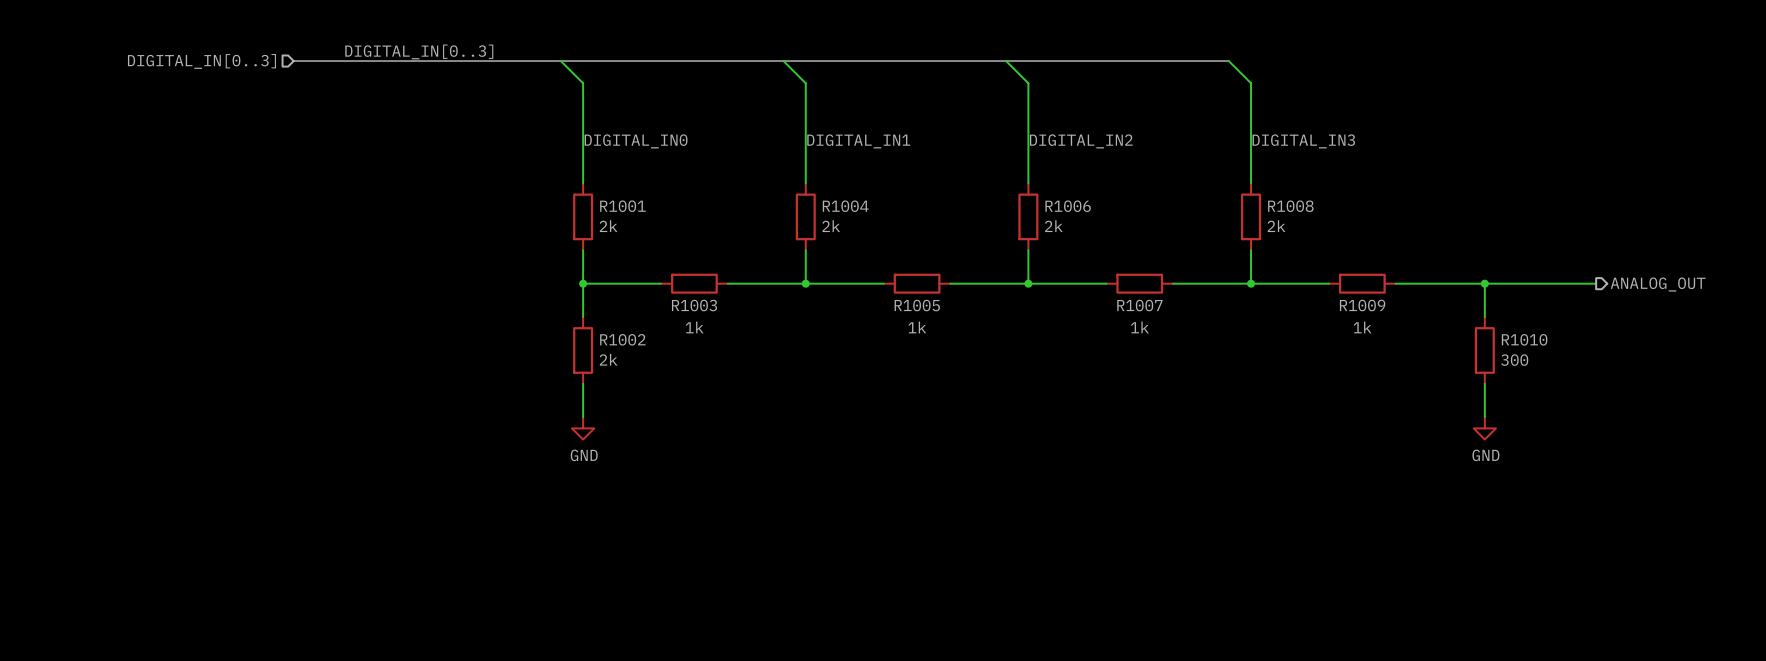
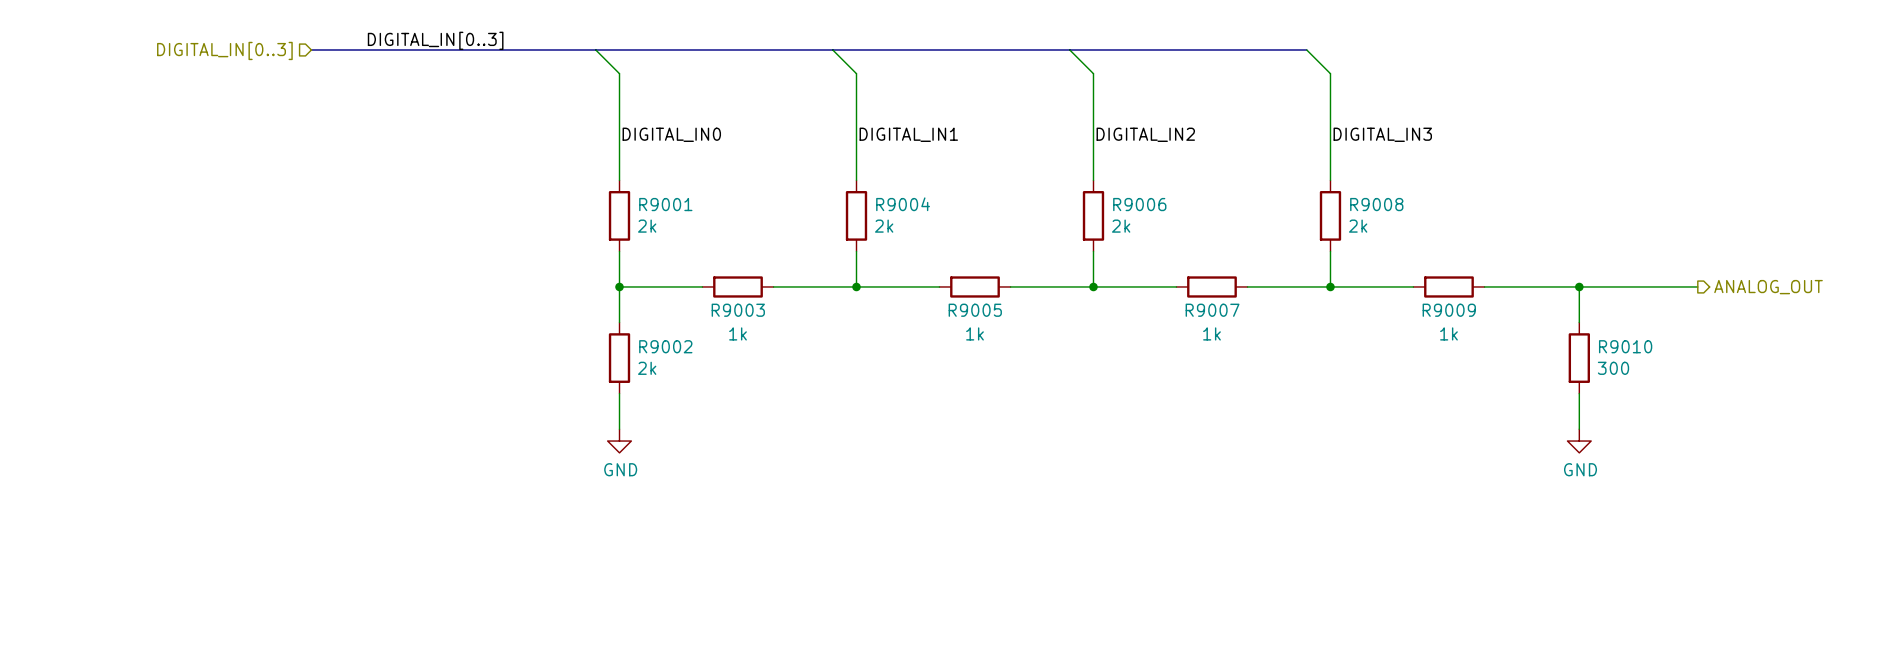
R1001 name: R1001 (622, 206) -> R9001 (665, 204)
R1004 name: R1004 (845, 206) -> R9004 (903, 204)
R1006 name: R1006 (1068, 206) -> R9006 (1139, 204)
R1008 name: R1008 (1290, 206) -> R9008 (1376, 204)
R1003 name: R1003 (694, 305) -> R9003 (738, 310)
R1005 name: R1005 (917, 305) -> R9005 (975, 310)
R1007 name: R1007 (1139, 305) -> R9007 (1212, 310)
R1009 name: R1009 (1362, 305) -> R9009 (1449, 310)
R1002 name: R1002 (622, 339) -> R9002 (665, 346)
R1010 name: R1010 (1524, 339) -> R9010 (1625, 346)

